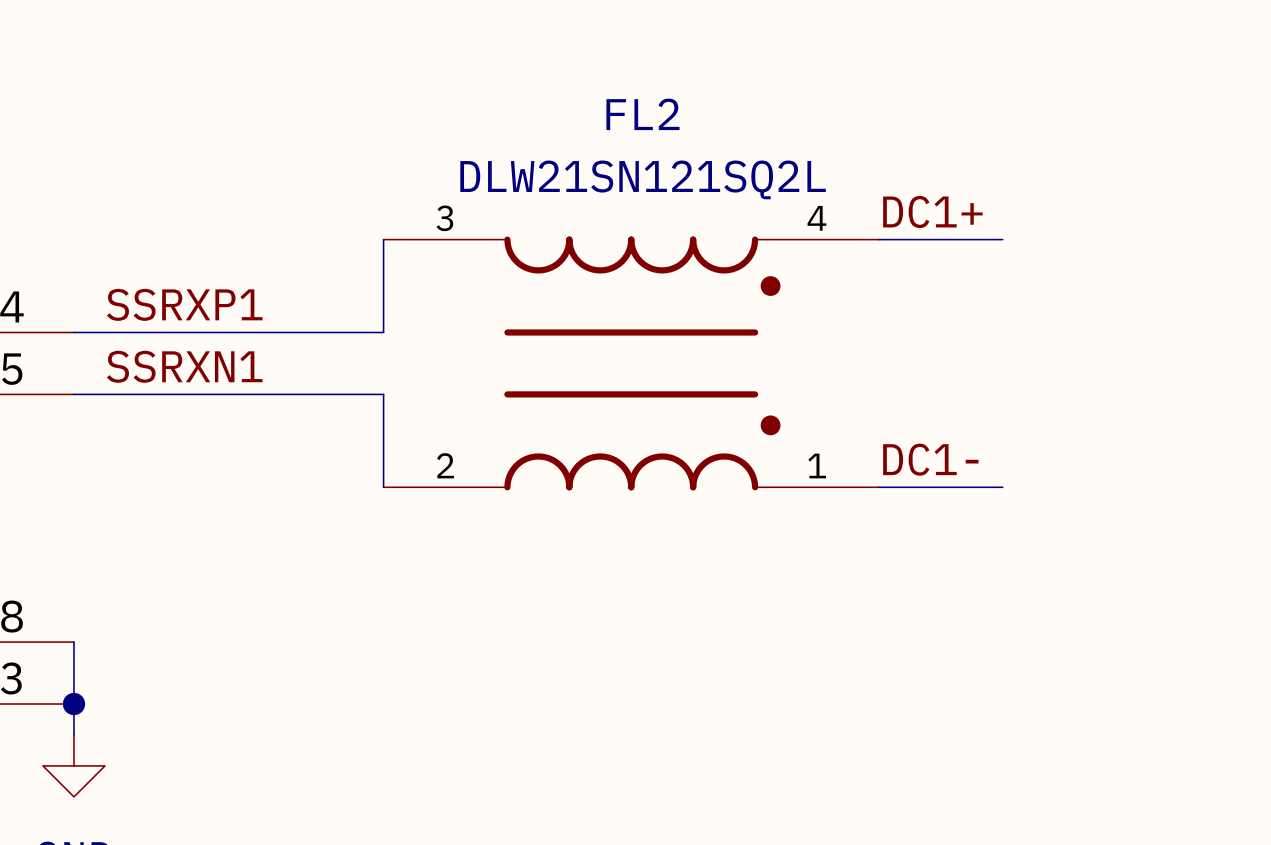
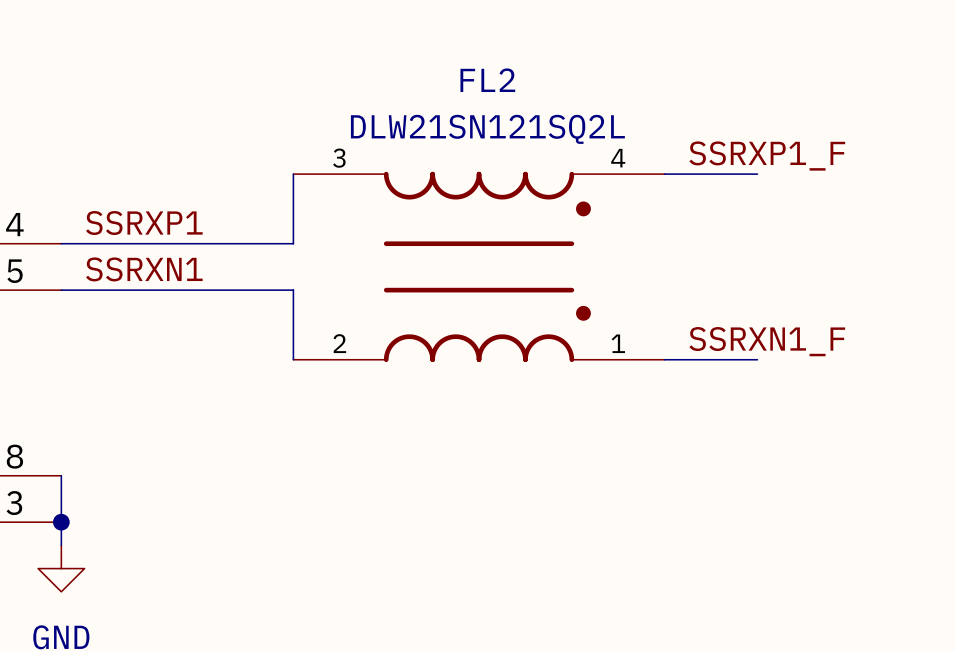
label: DC1+ (932, 211) -> none
label: none -> SSRXP1_F (767, 156)
label: DC1- (930, 459) -> none
label: none -> SSRXN1_F (767, 341)

